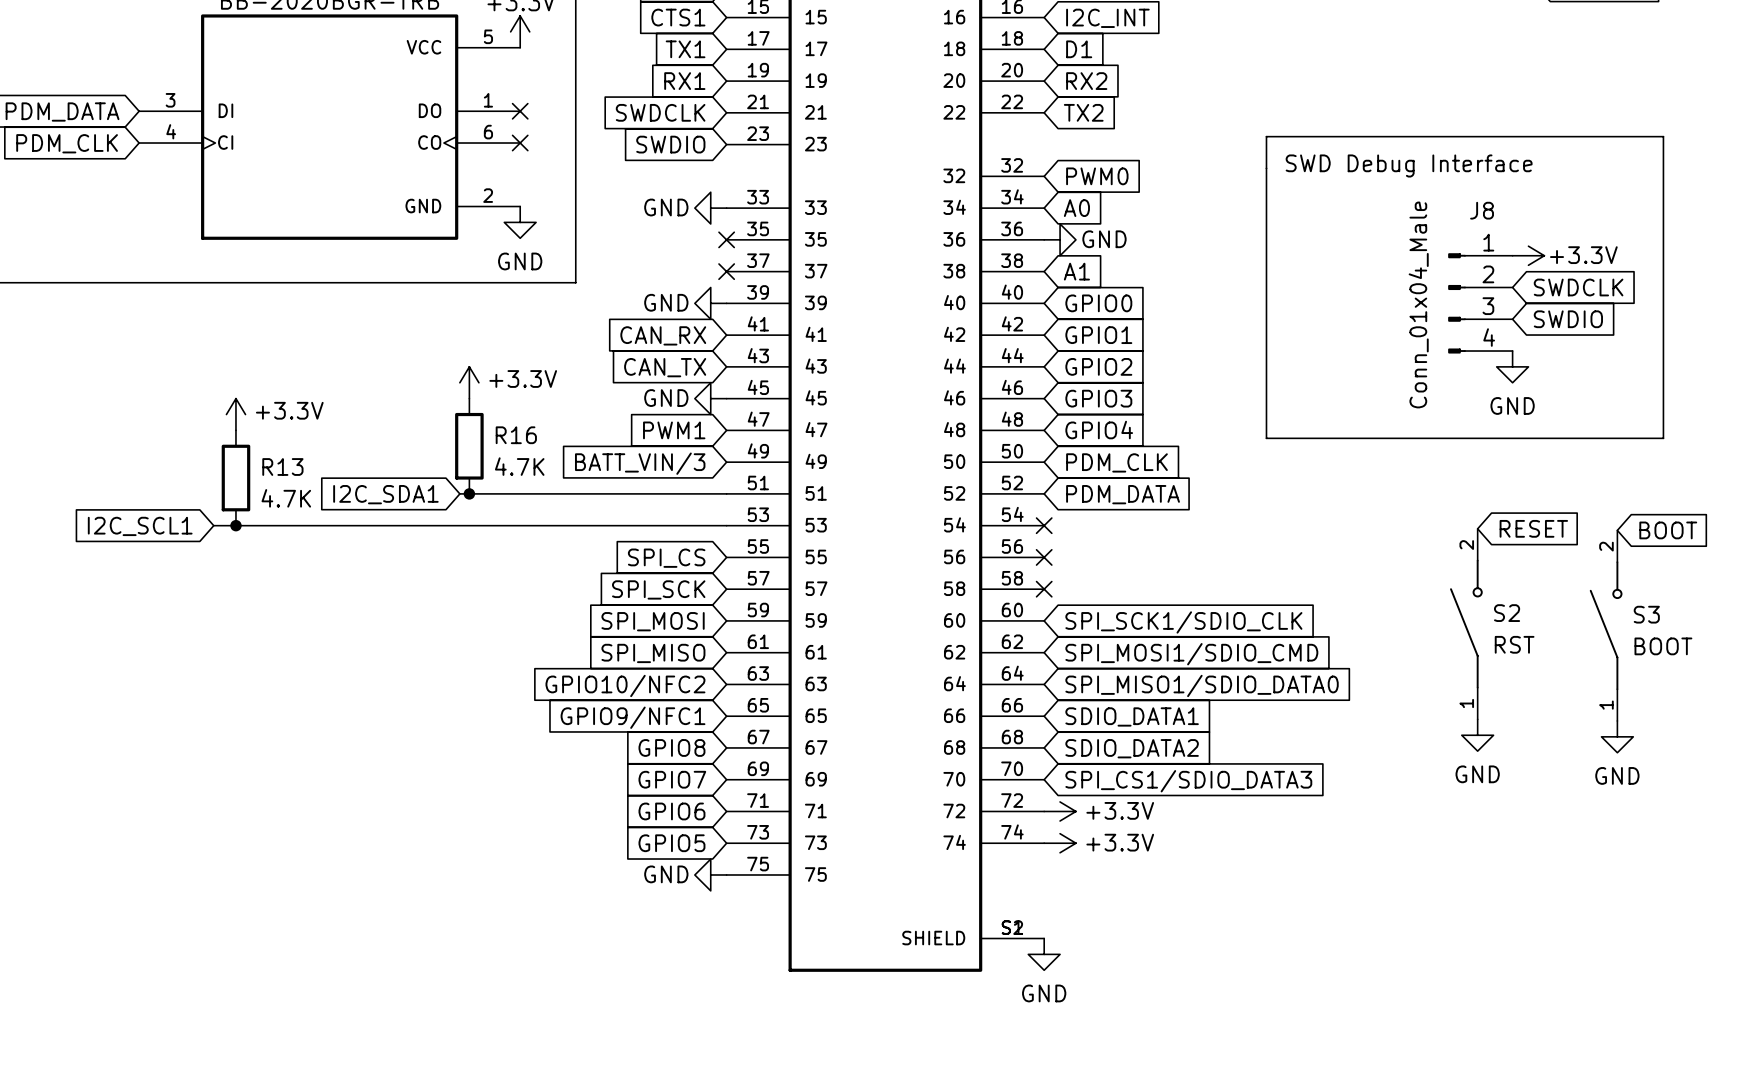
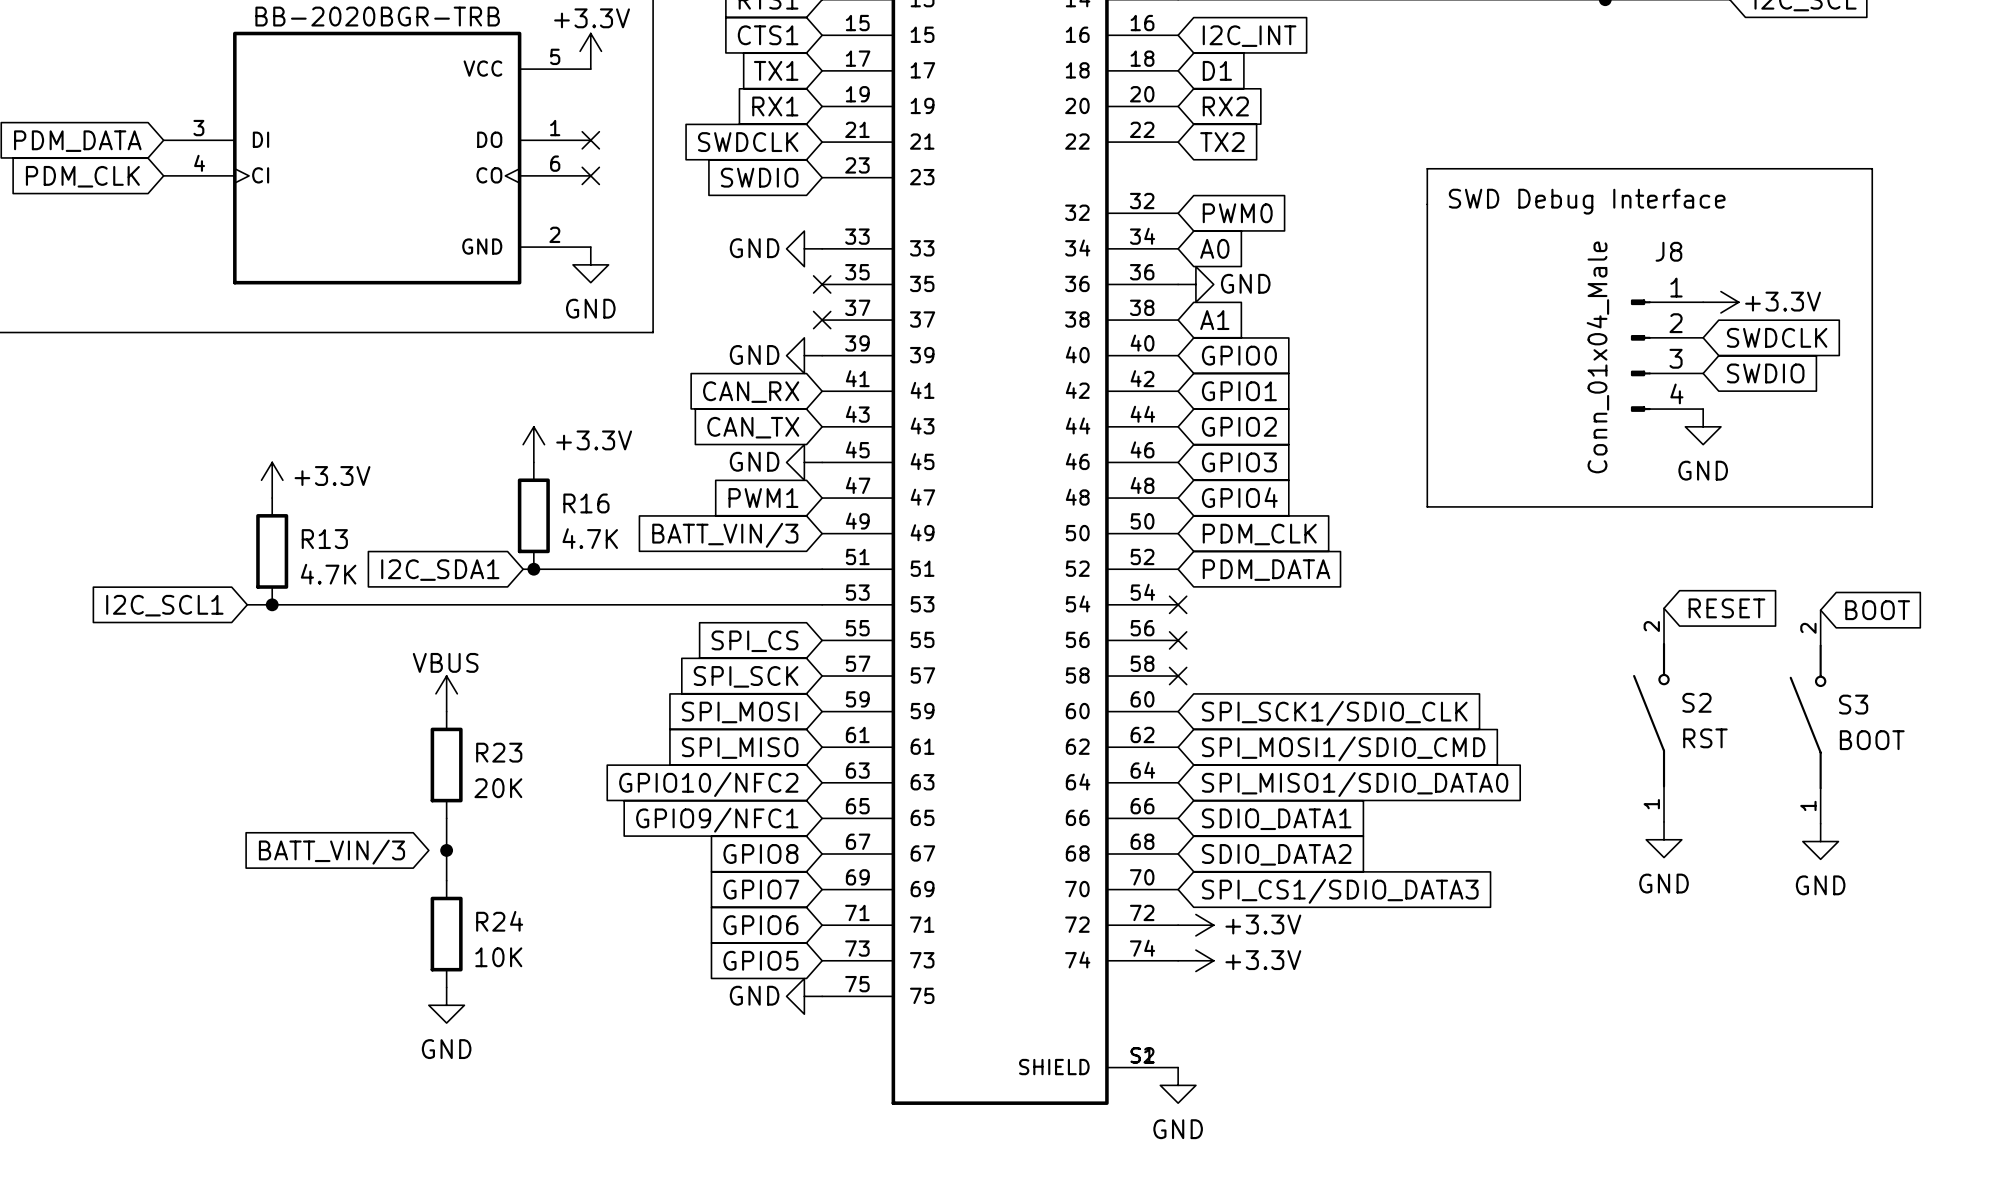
power symbol: none -> VBUS (446, 693)
R23: none -> 20K (446, 765)
wire: none -> (446, 818) (446, 880)
junction: none -> (446, 850)
global label: none -> BATT_VIN/3 (331, 852)
R24: none -> 10K (446, 934)
power symbol: none -> GND (446, 1005)

